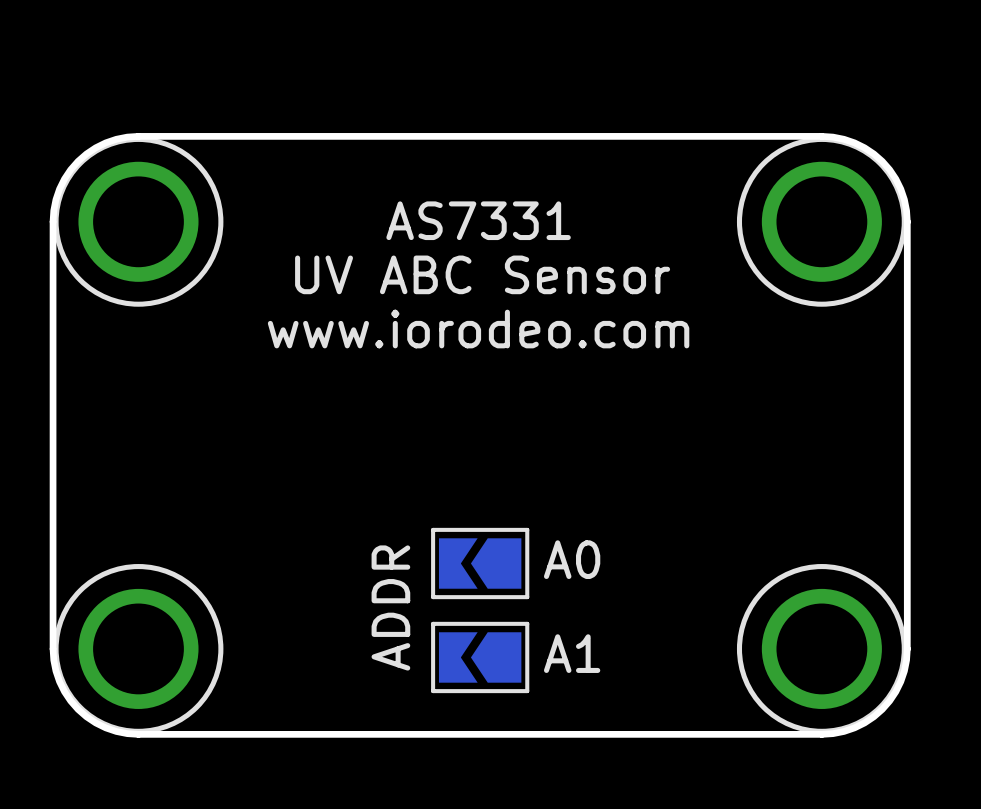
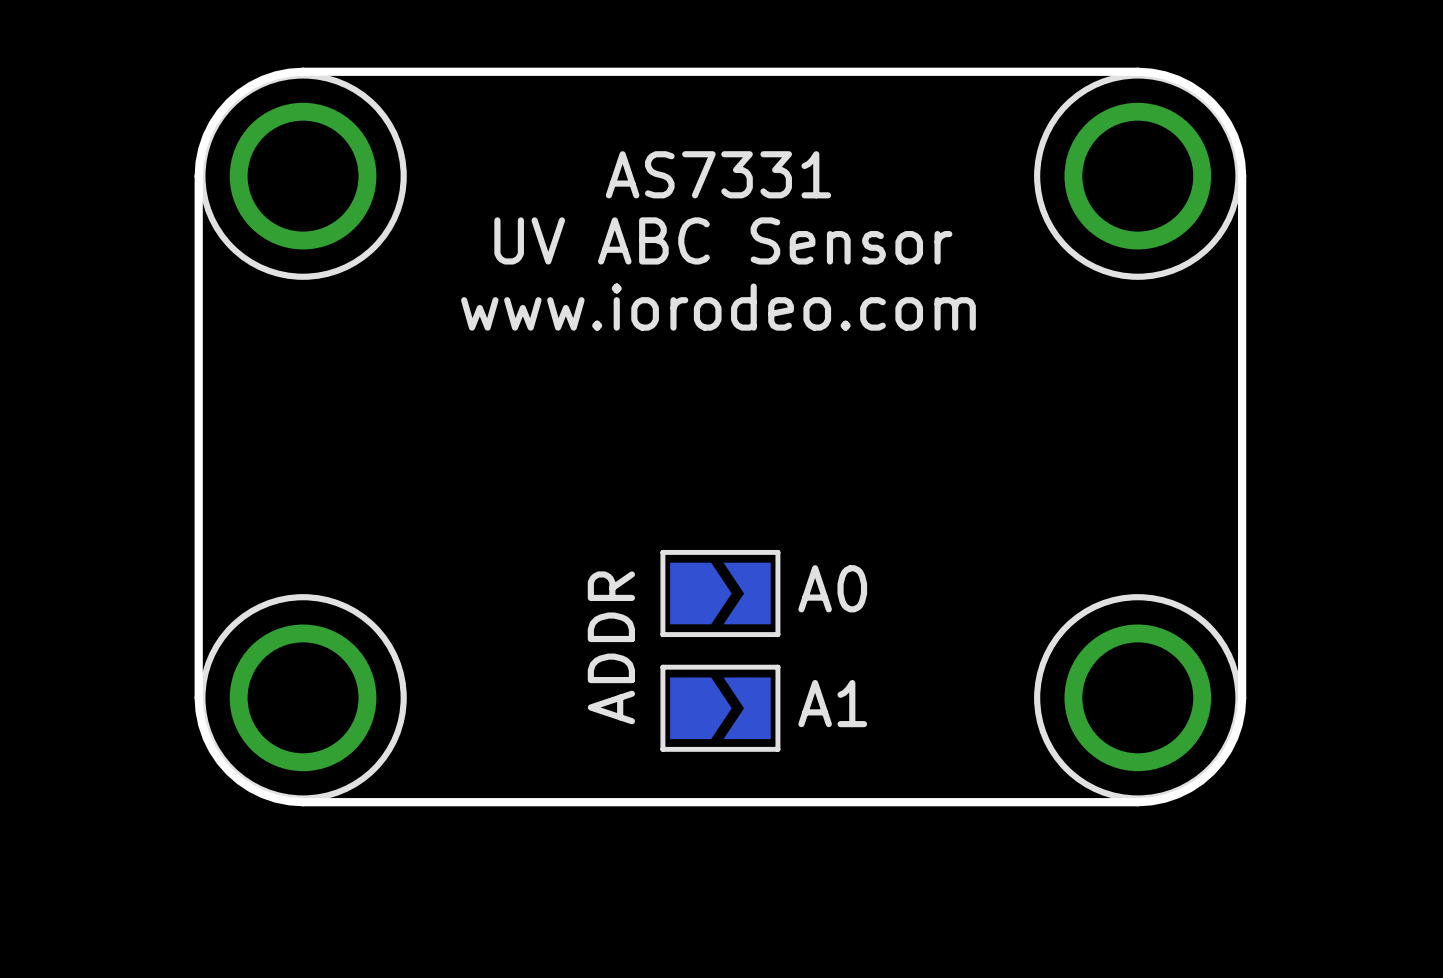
part rotation: 0° (480, 563) -> 180° (720, 593)
part rotation: 0° (480, 657) -> 180° (720, 708)

